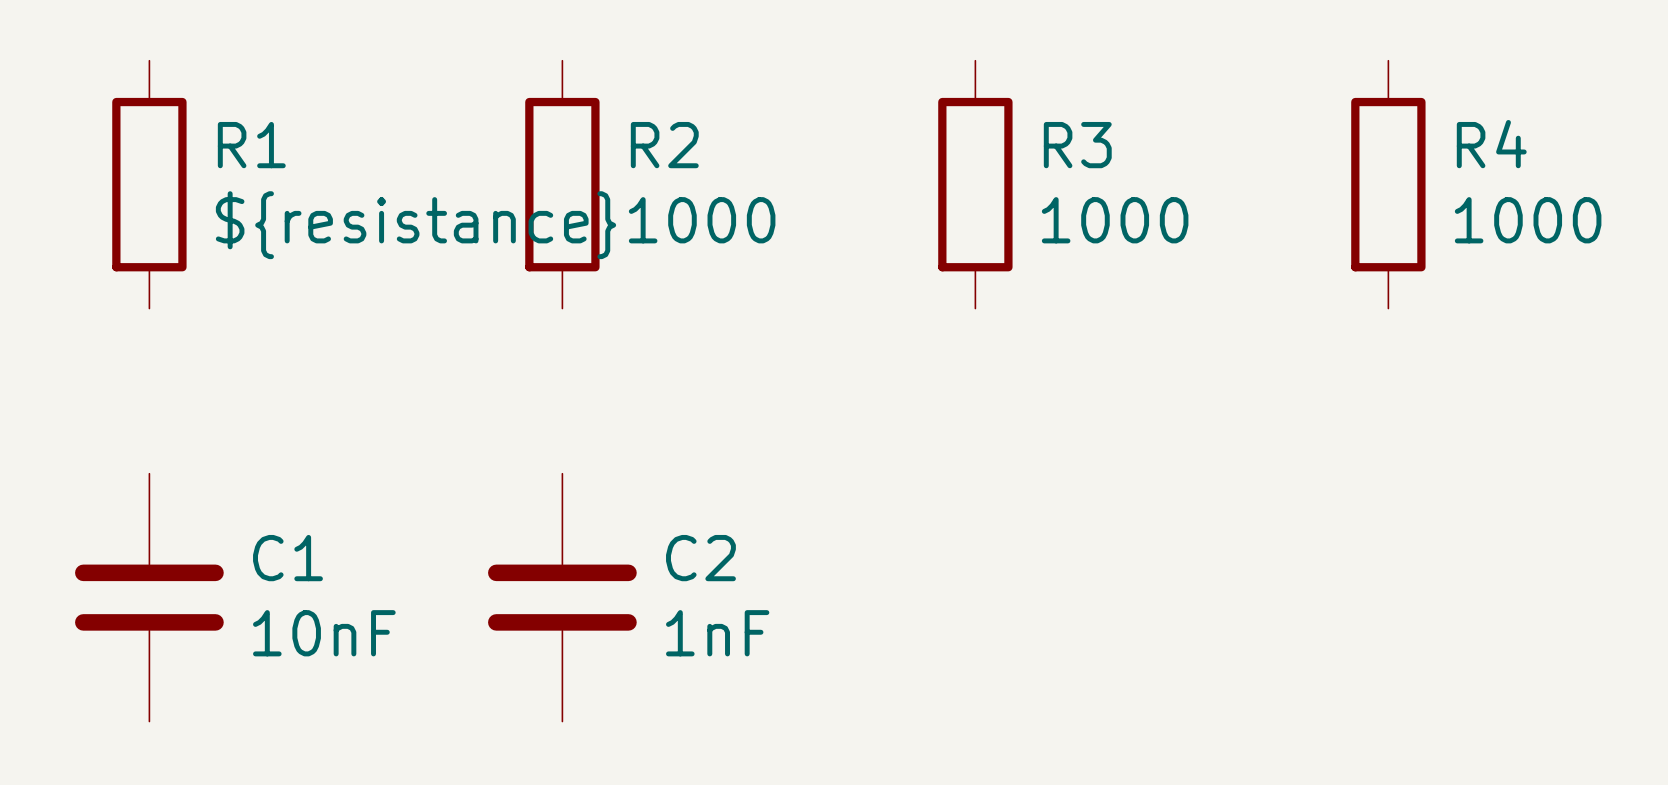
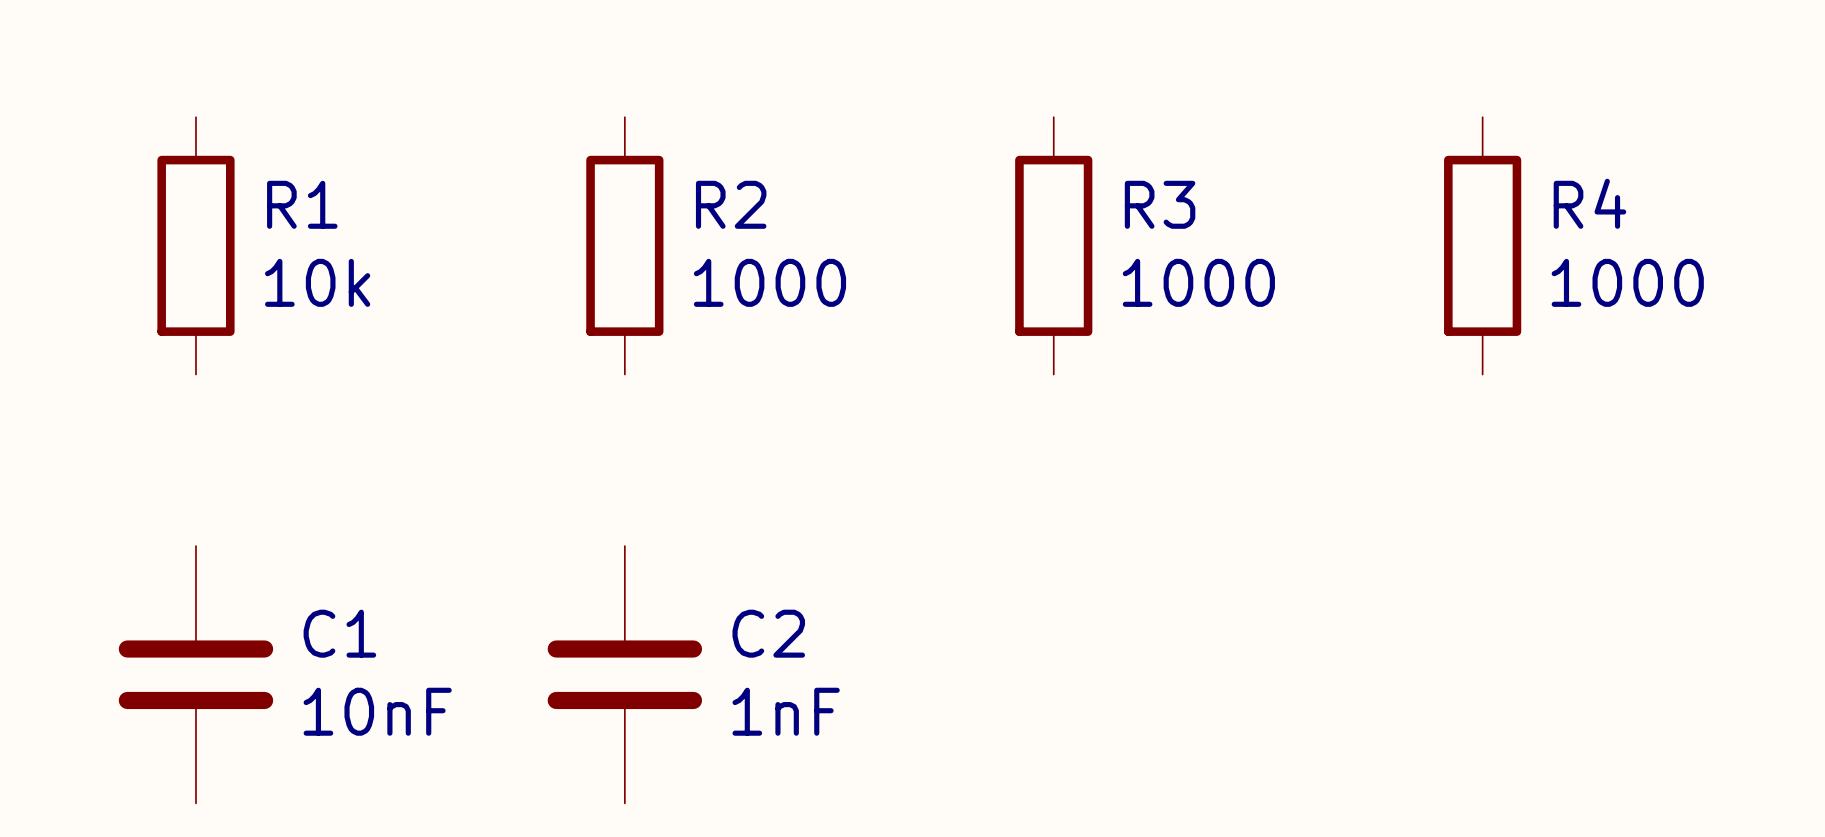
R1 value: ${resistance} (415, 225) -> 10k (317, 282)

